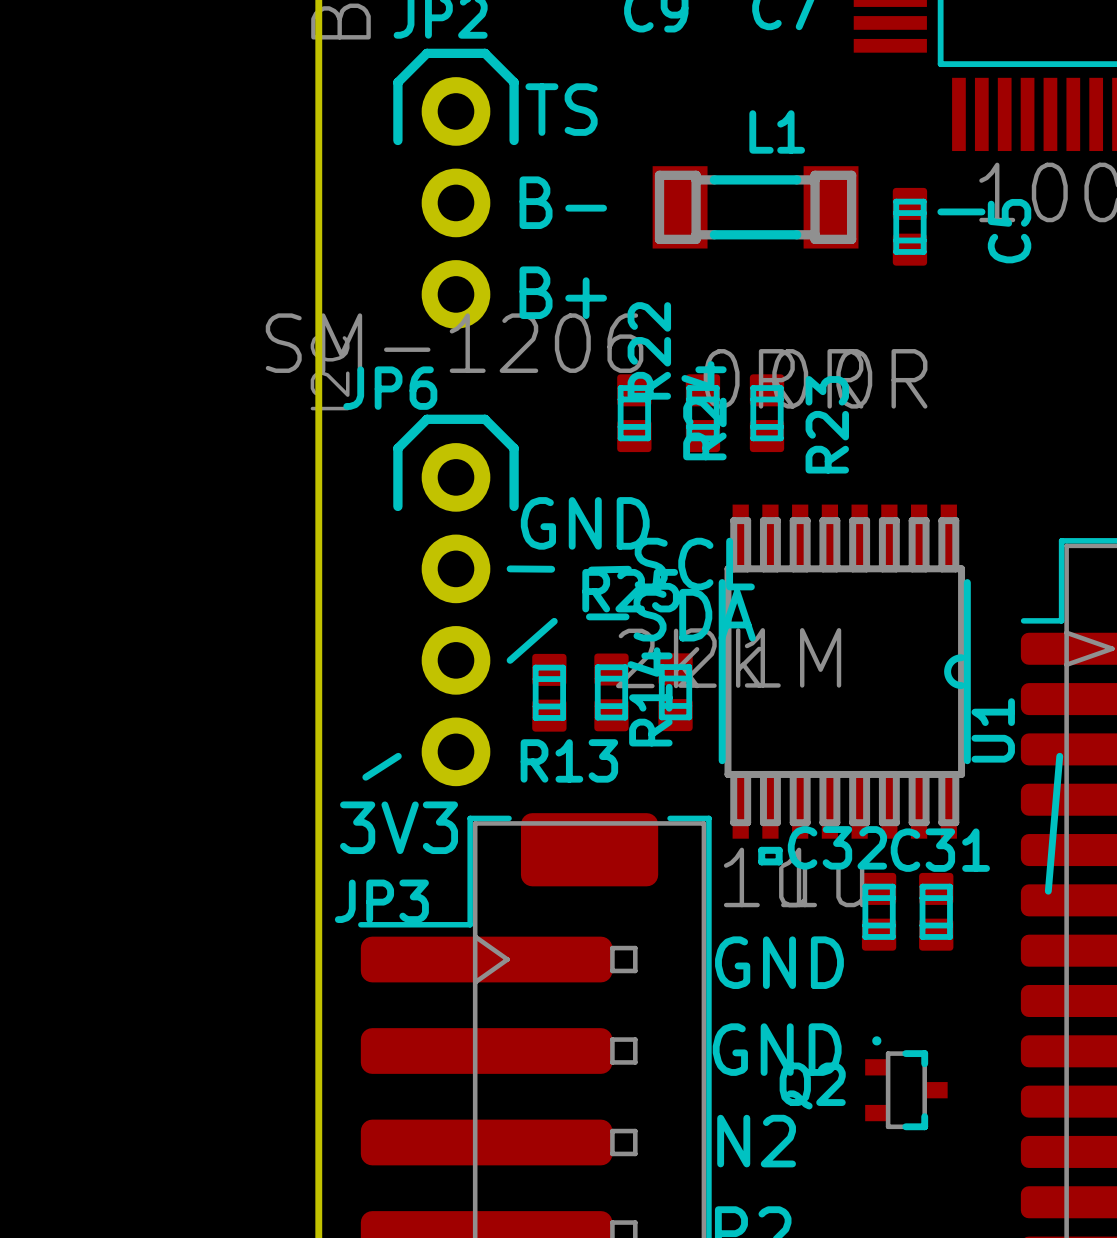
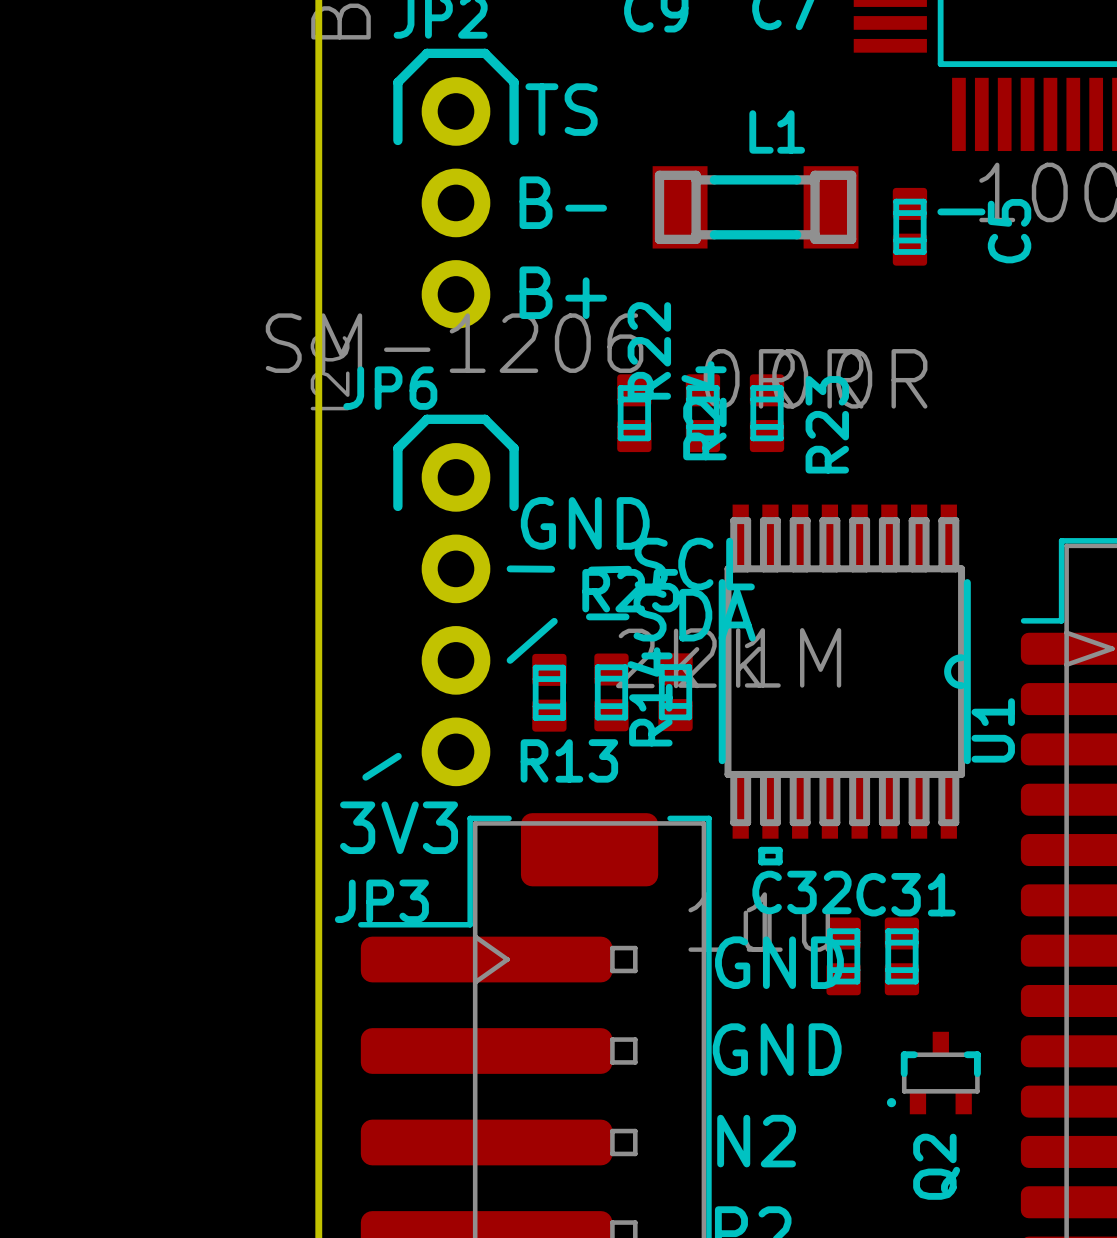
line: (1059, 756) (1048, 891) -> none
C32 position: (879, 911) -> (843, 956)
C31 position: (936, 911) -> (901, 956)
Q2 rotation: 0° (906, 1083) -> 90° counterclockwise (933, 1073)

